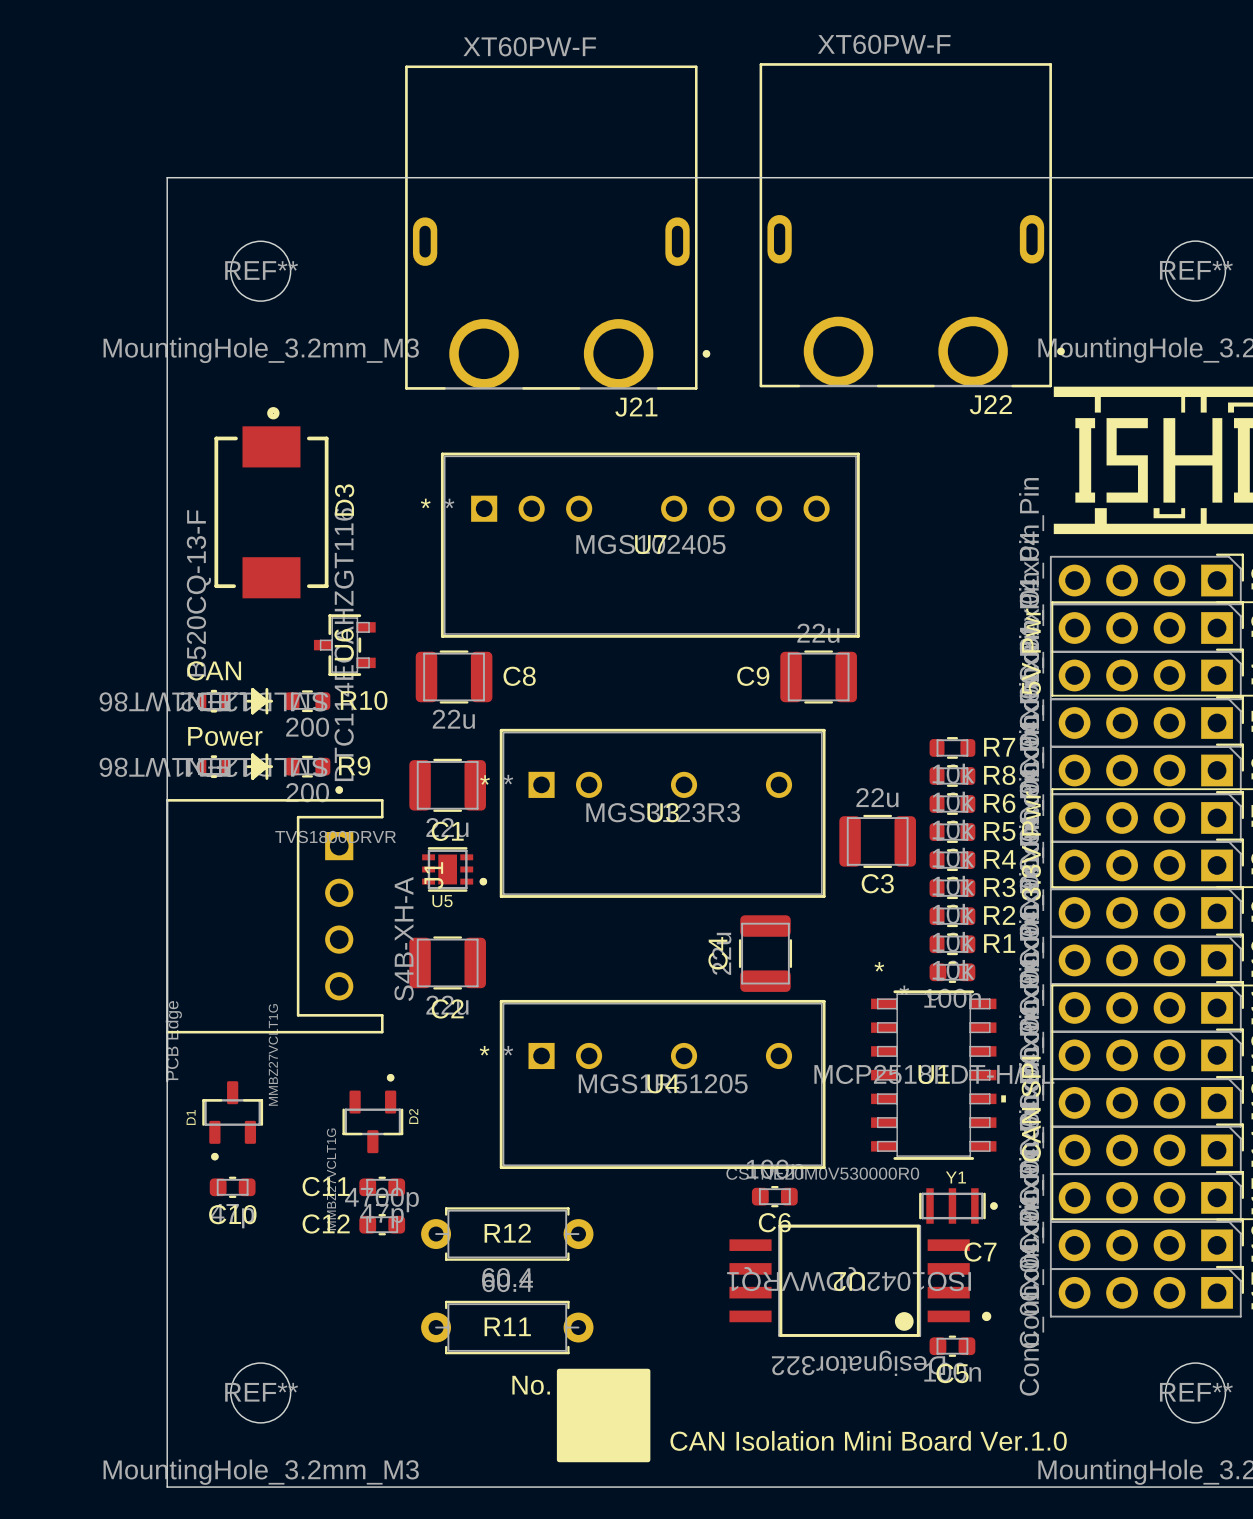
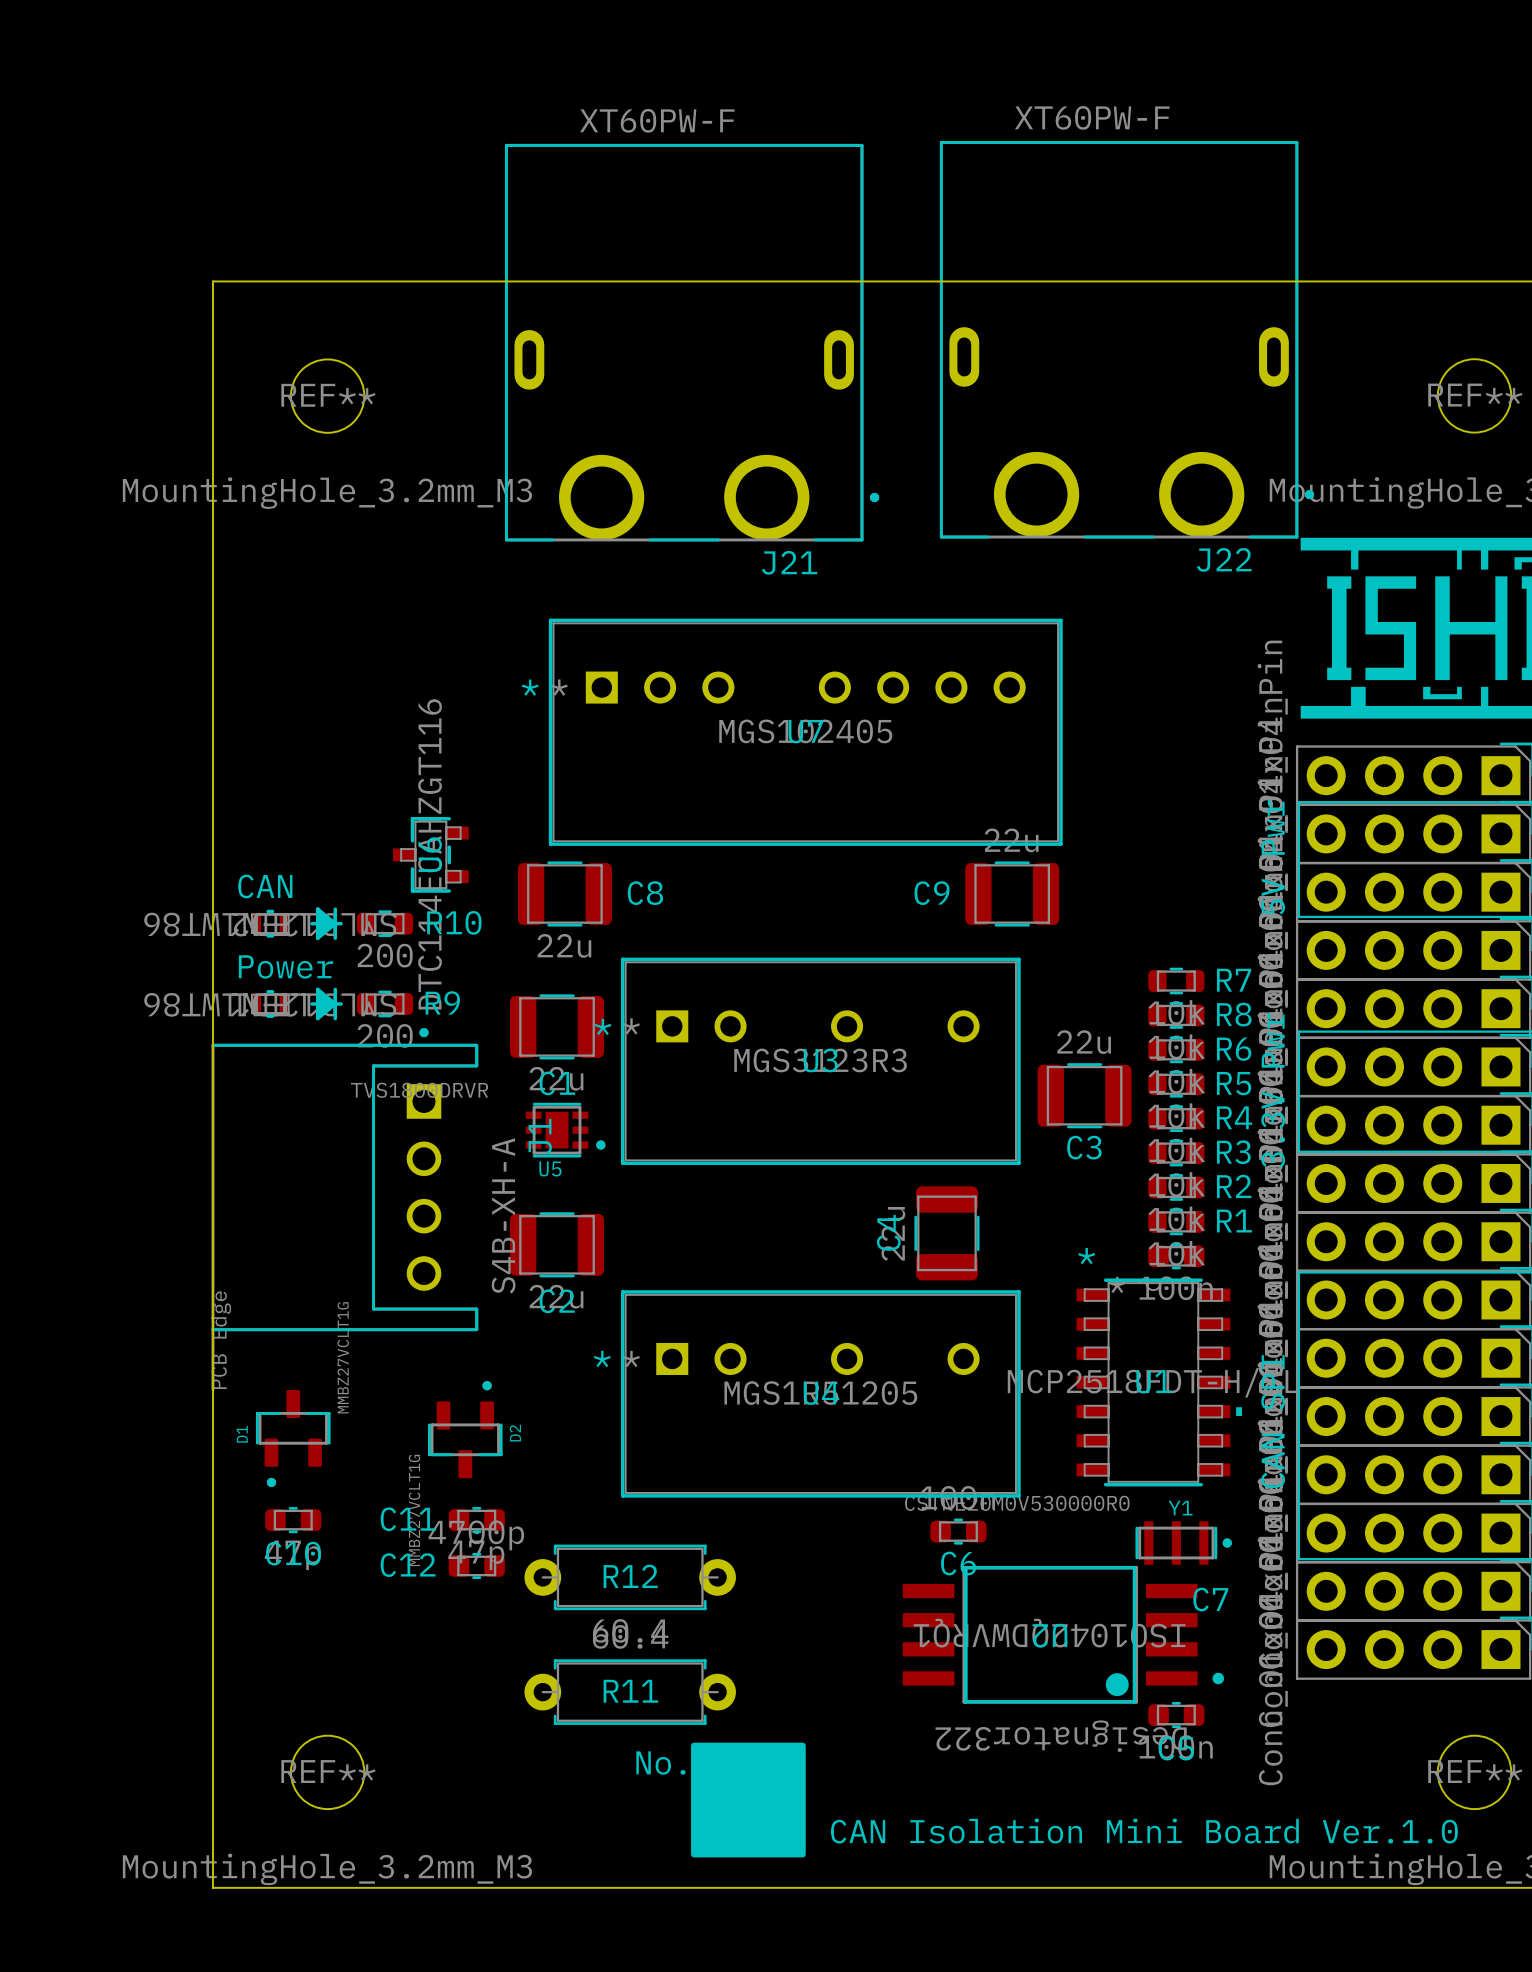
D3: B520CQ-13-F (271, 502) -> none

